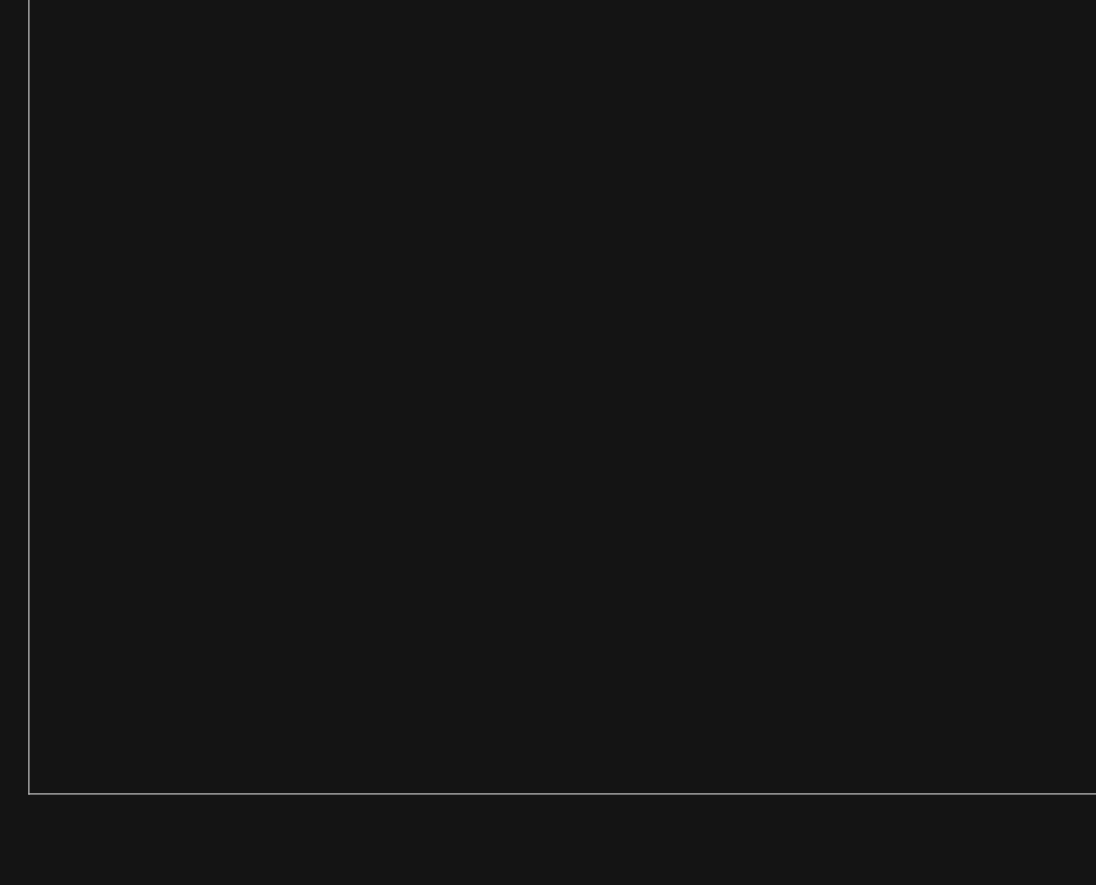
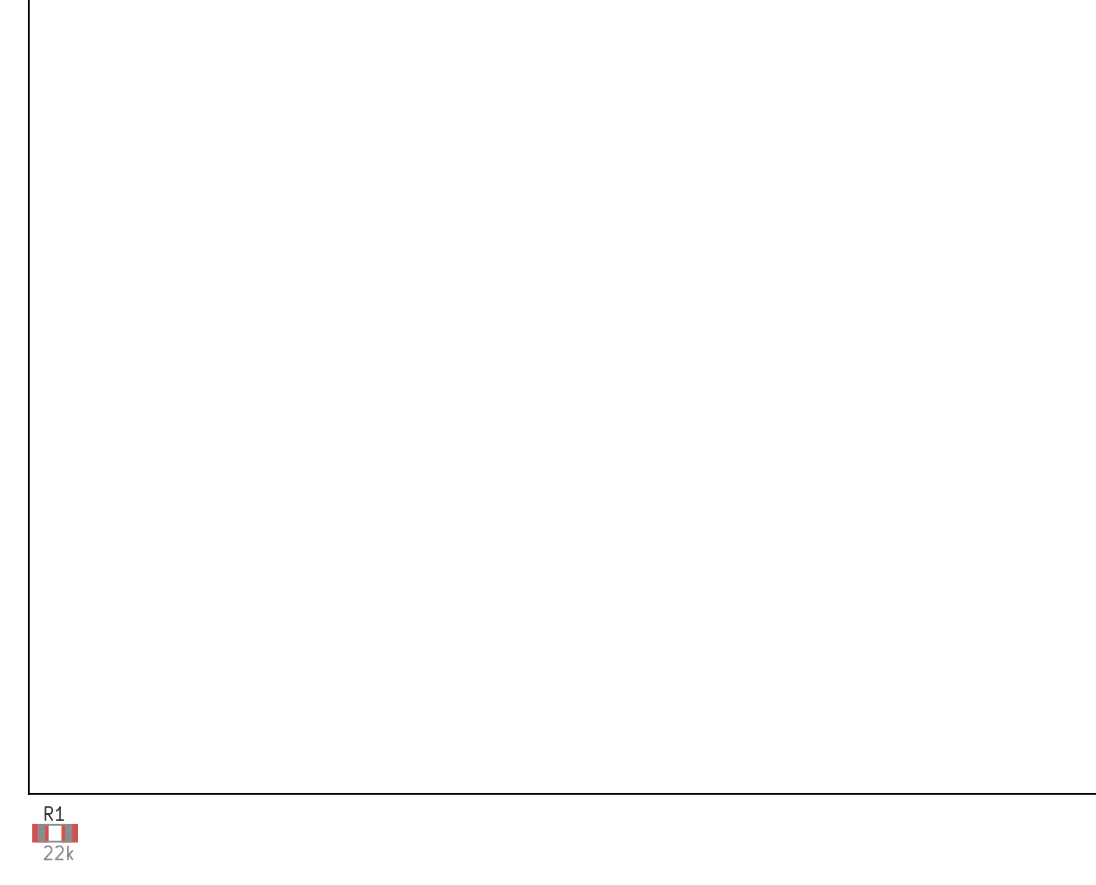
R1: none -> 22k (55, 833)

